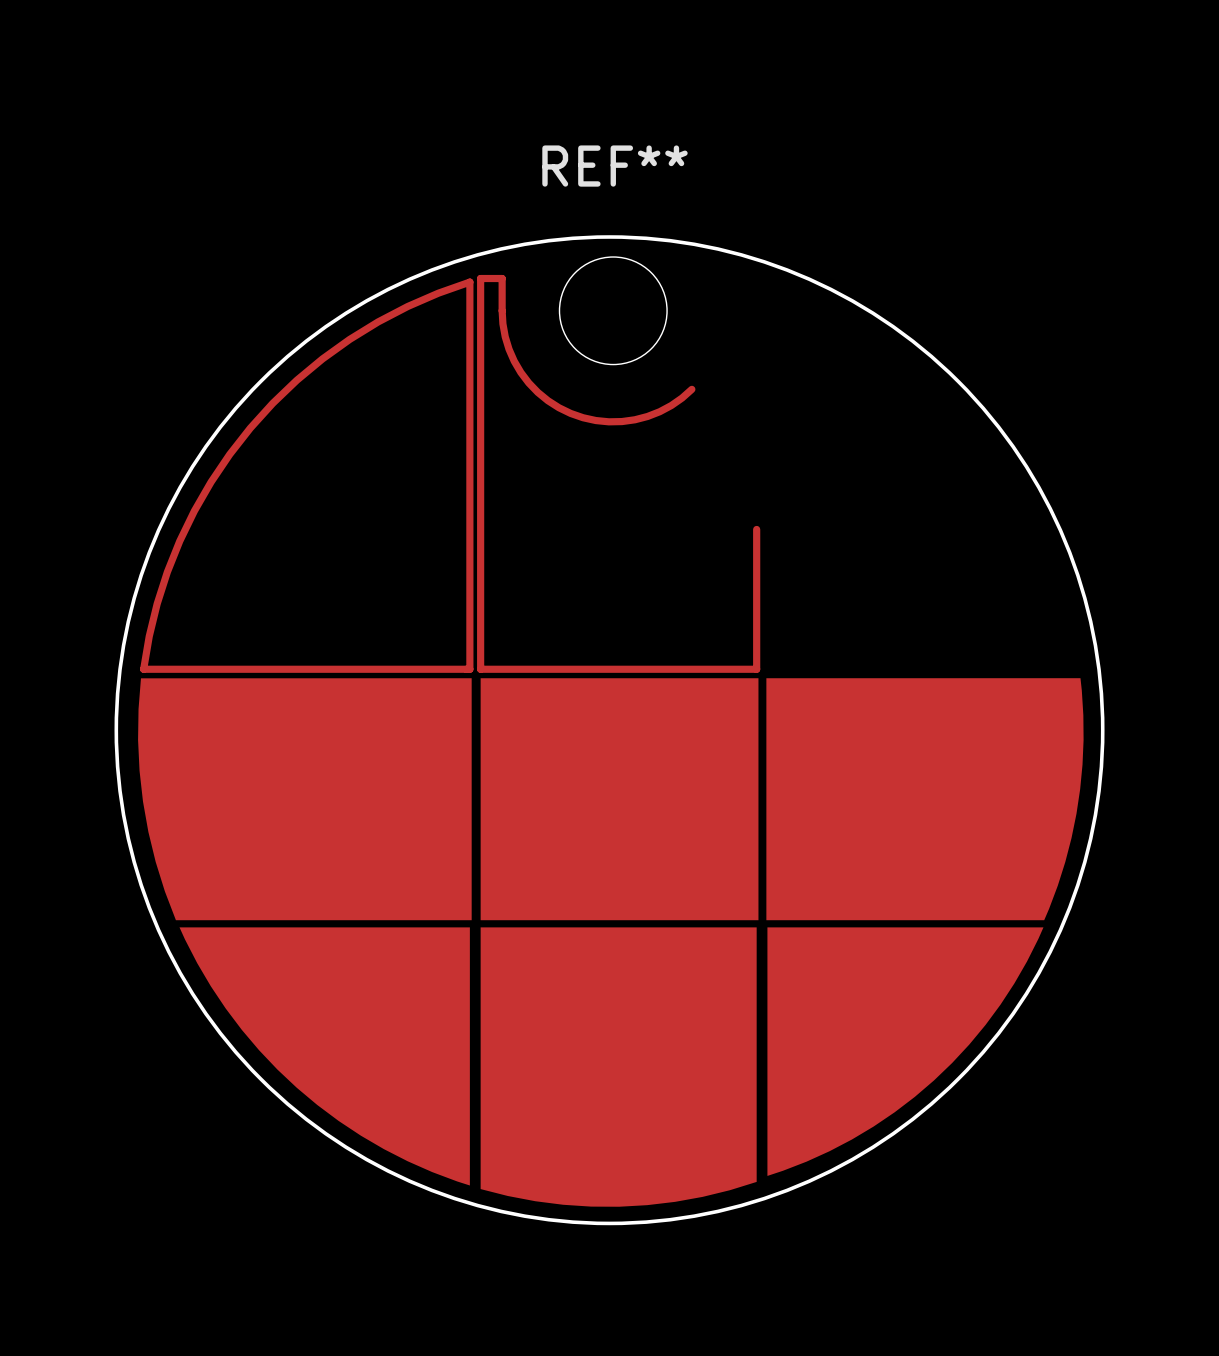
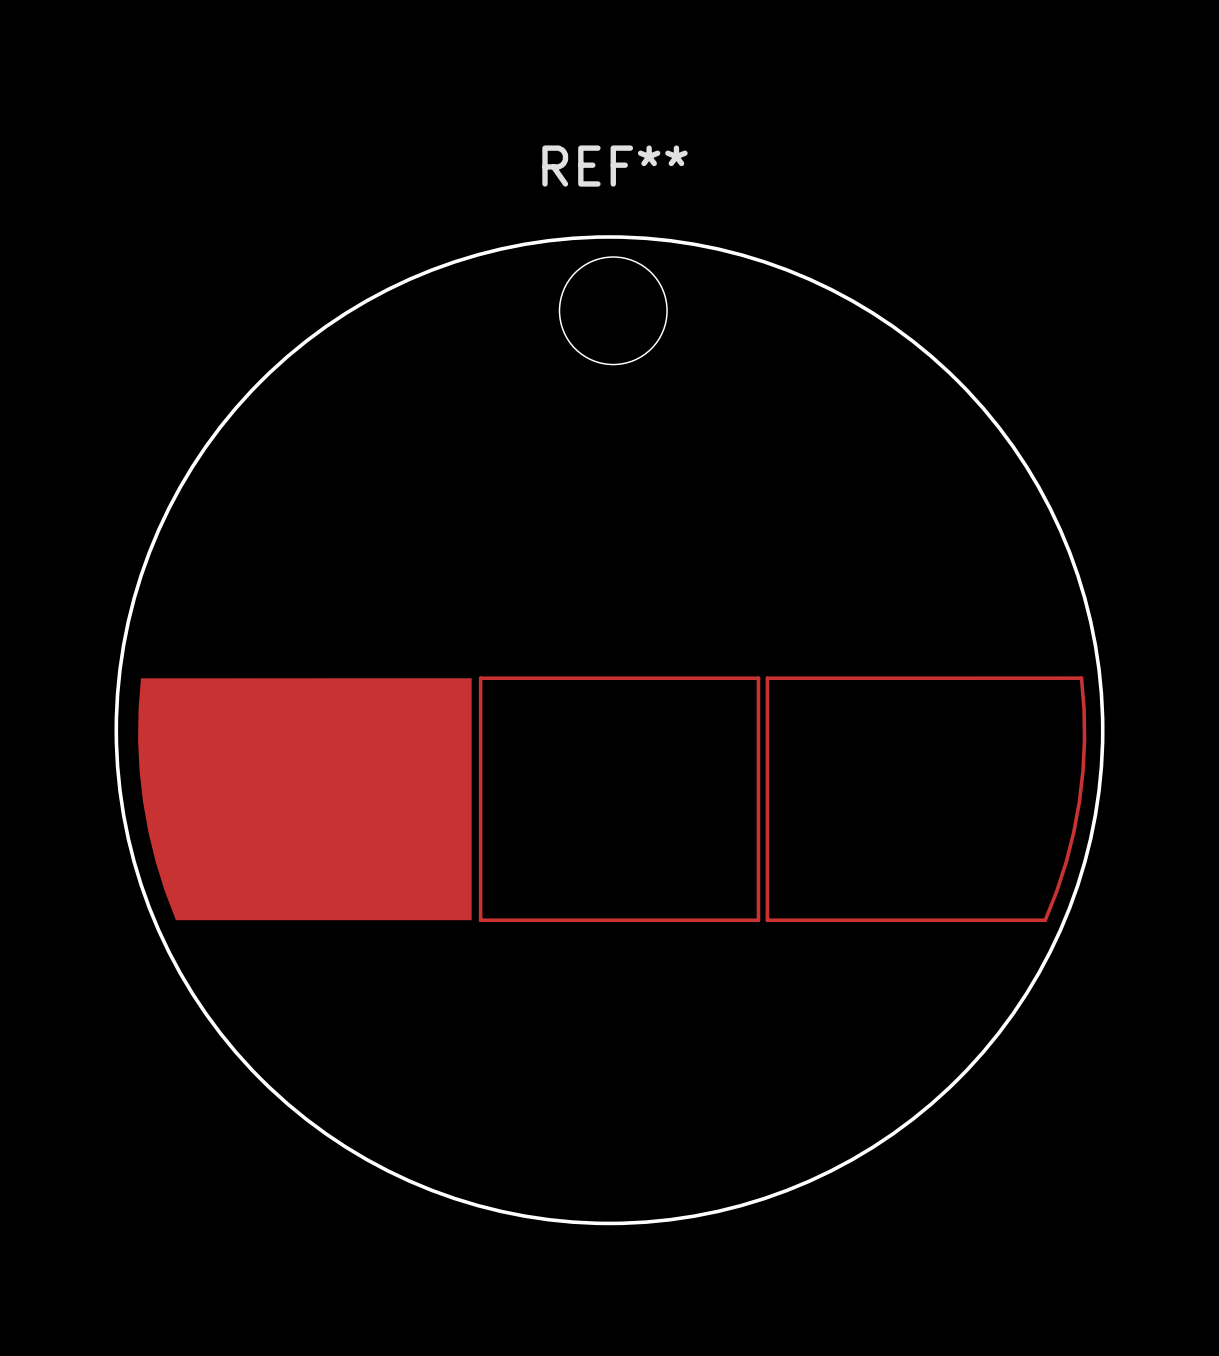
track: (469, 282) (469, 669) (143, 669) (157, 603) (179, 541) (211, 482) (250, 428) (296, 380) (349, 339) (407, 306) (469, 282) -> none
track: (691, 389) (671, 405) (647, 416) (634, 419) (608, 421) (595, 420) (570, 413) (558, 407) (537, 392) (520, 372) (514, 361) (509, 349) (502, 323) (502, 278) (480, 278) (480, 669) (756, 669) (756, 529) -> none
drawing: [179, 678, 1084, 1207] -> none
track: none -> (480, 678) (758, 678) (758, 920) (480, 920) (480, 678)
track: none -> (767, 678) (767, 920) (1045, 920) (1066, 862) (1079, 801) (1084, 739) (1081, 678) (767, 678)

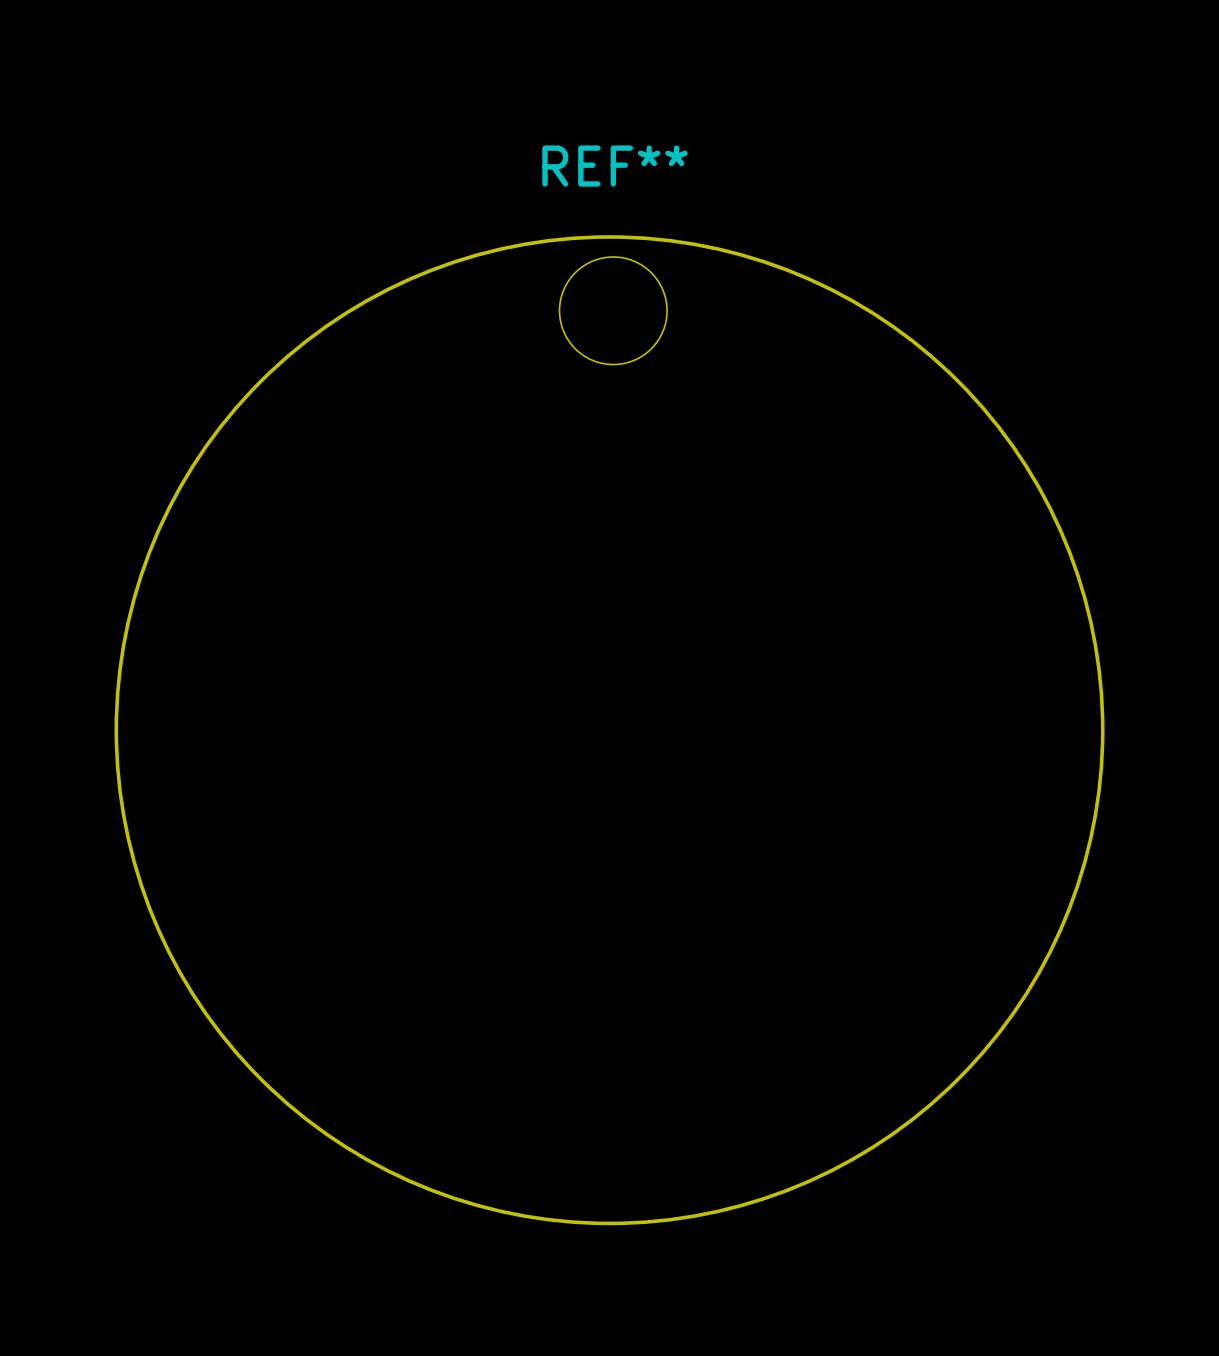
drawing: [138, 678, 472, 921] -> none
track: (480, 678) (758, 678) (758, 920) (480, 920) (480, 678) -> none
track: (767, 678) (767, 920) (1045, 920) (1066, 862) (1079, 801) (1084, 739) (1081, 678) (767, 678) -> none

